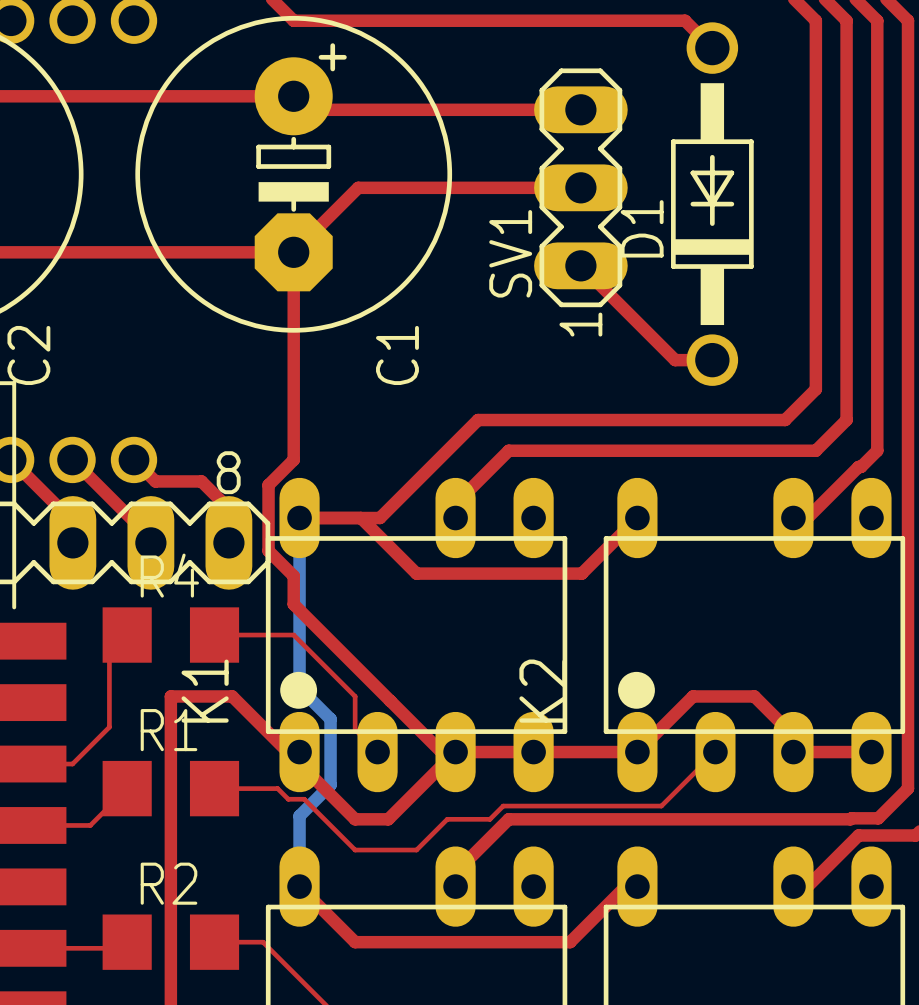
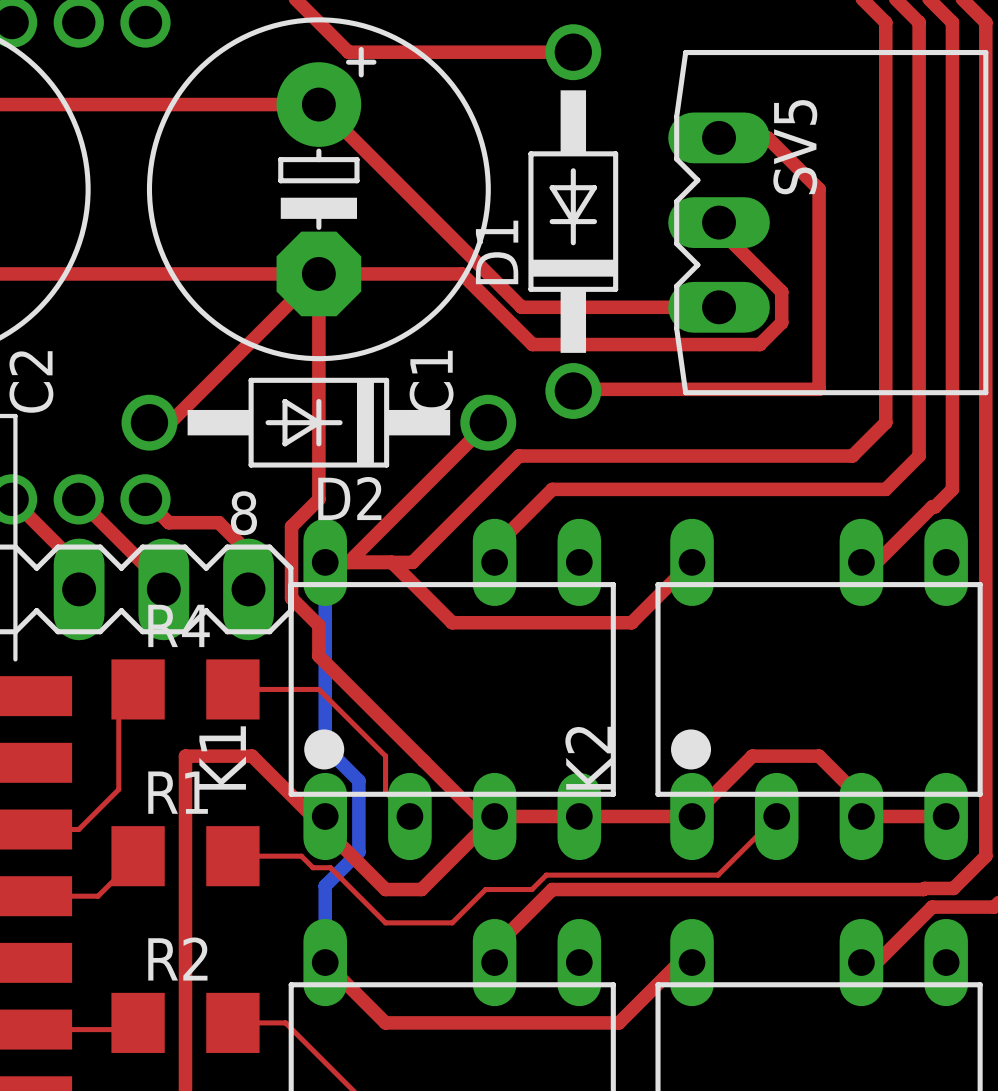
top track: (293, 20) (685, 20) (712, 48) -> (318, 22) (348, 52) (573, 52)
top track: (307, 109) (580, 109) -> (333, 119) (521, 307) (719, 307)
top track: none -> (719, 137) (767, 137) (819, 189) (819, 389) (574, 389) (573, 390)
top track: (580, 187) (358, 187) (293, 252) -> none
SV1: (580, 187) -> none
D1 position: (712, 204) -> (573, 221)
top track: none -> (719, 222) (719, 229) (781, 291) (781, 322) (759, 344) (532, 344) (461, 273) (318, 273) (170, 422) (149, 422)
SV5: none -> (828, 222)
top track: (580, 265) (675, 360) (712, 360) -> none
D2: none -> (318, 422)
top track: none -> (488, 422) (348, 562)

